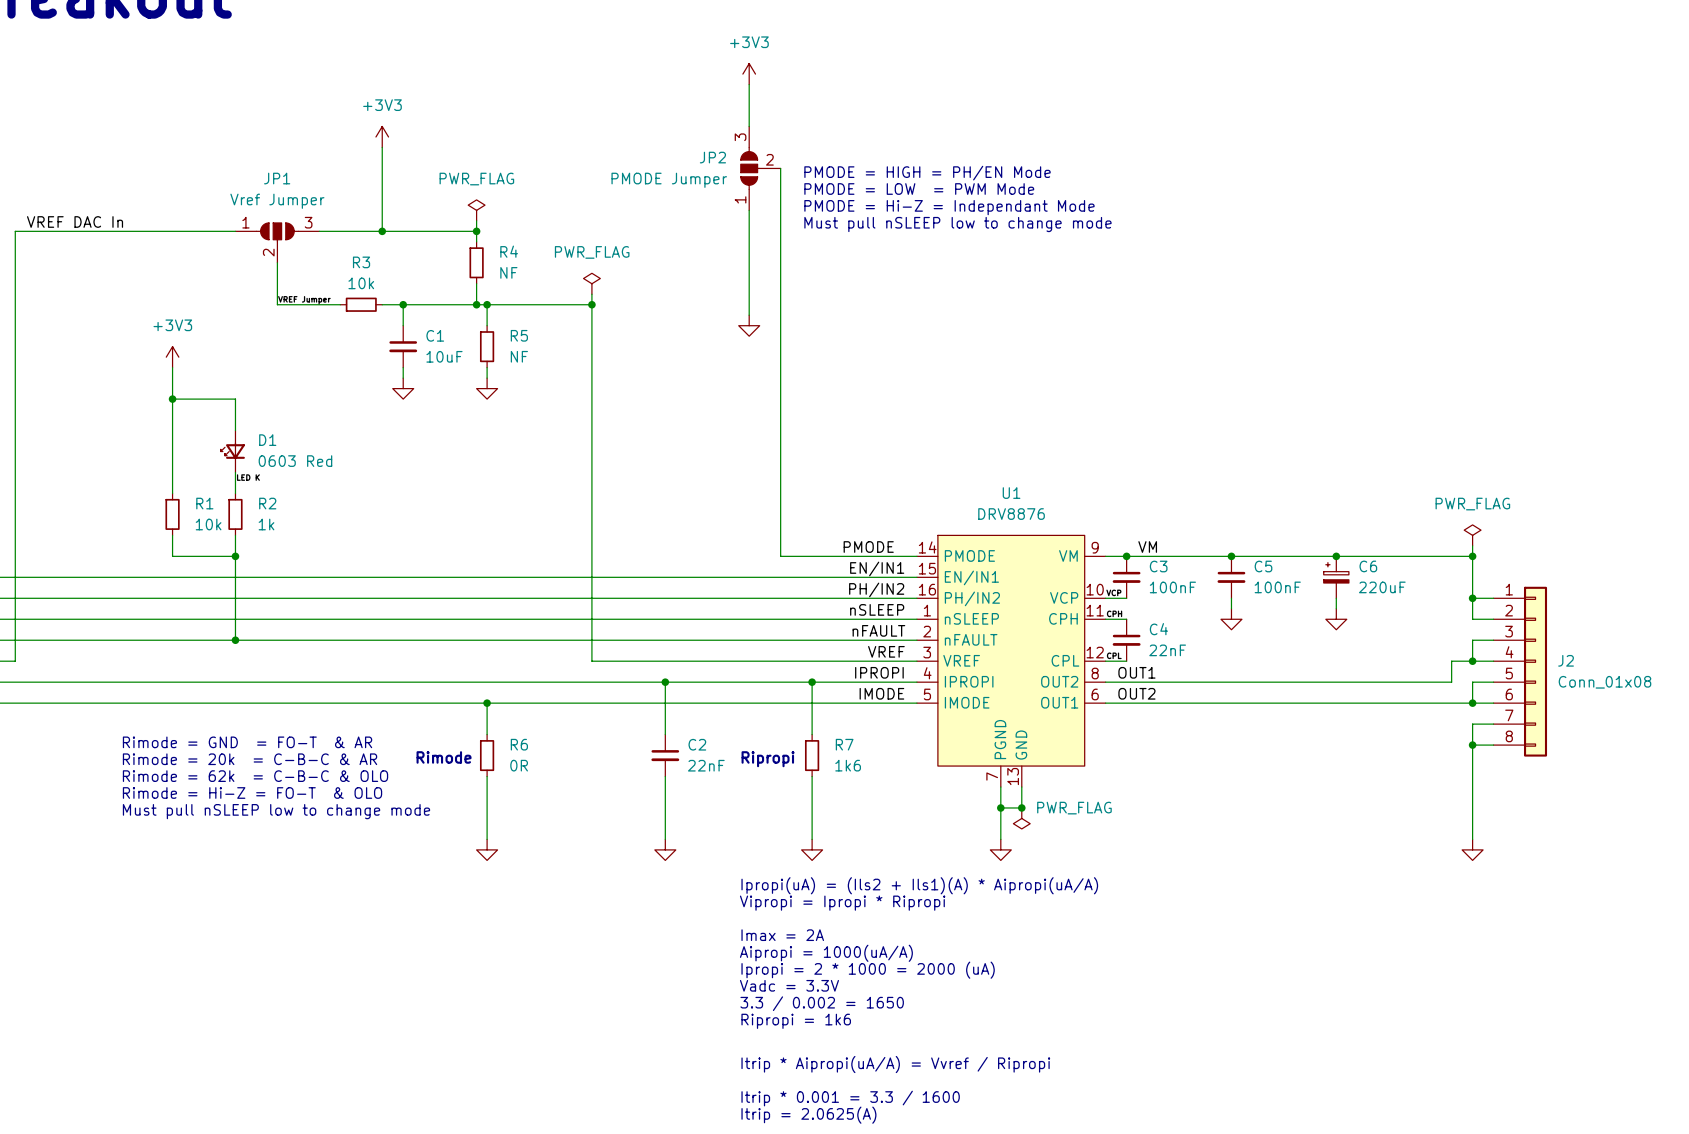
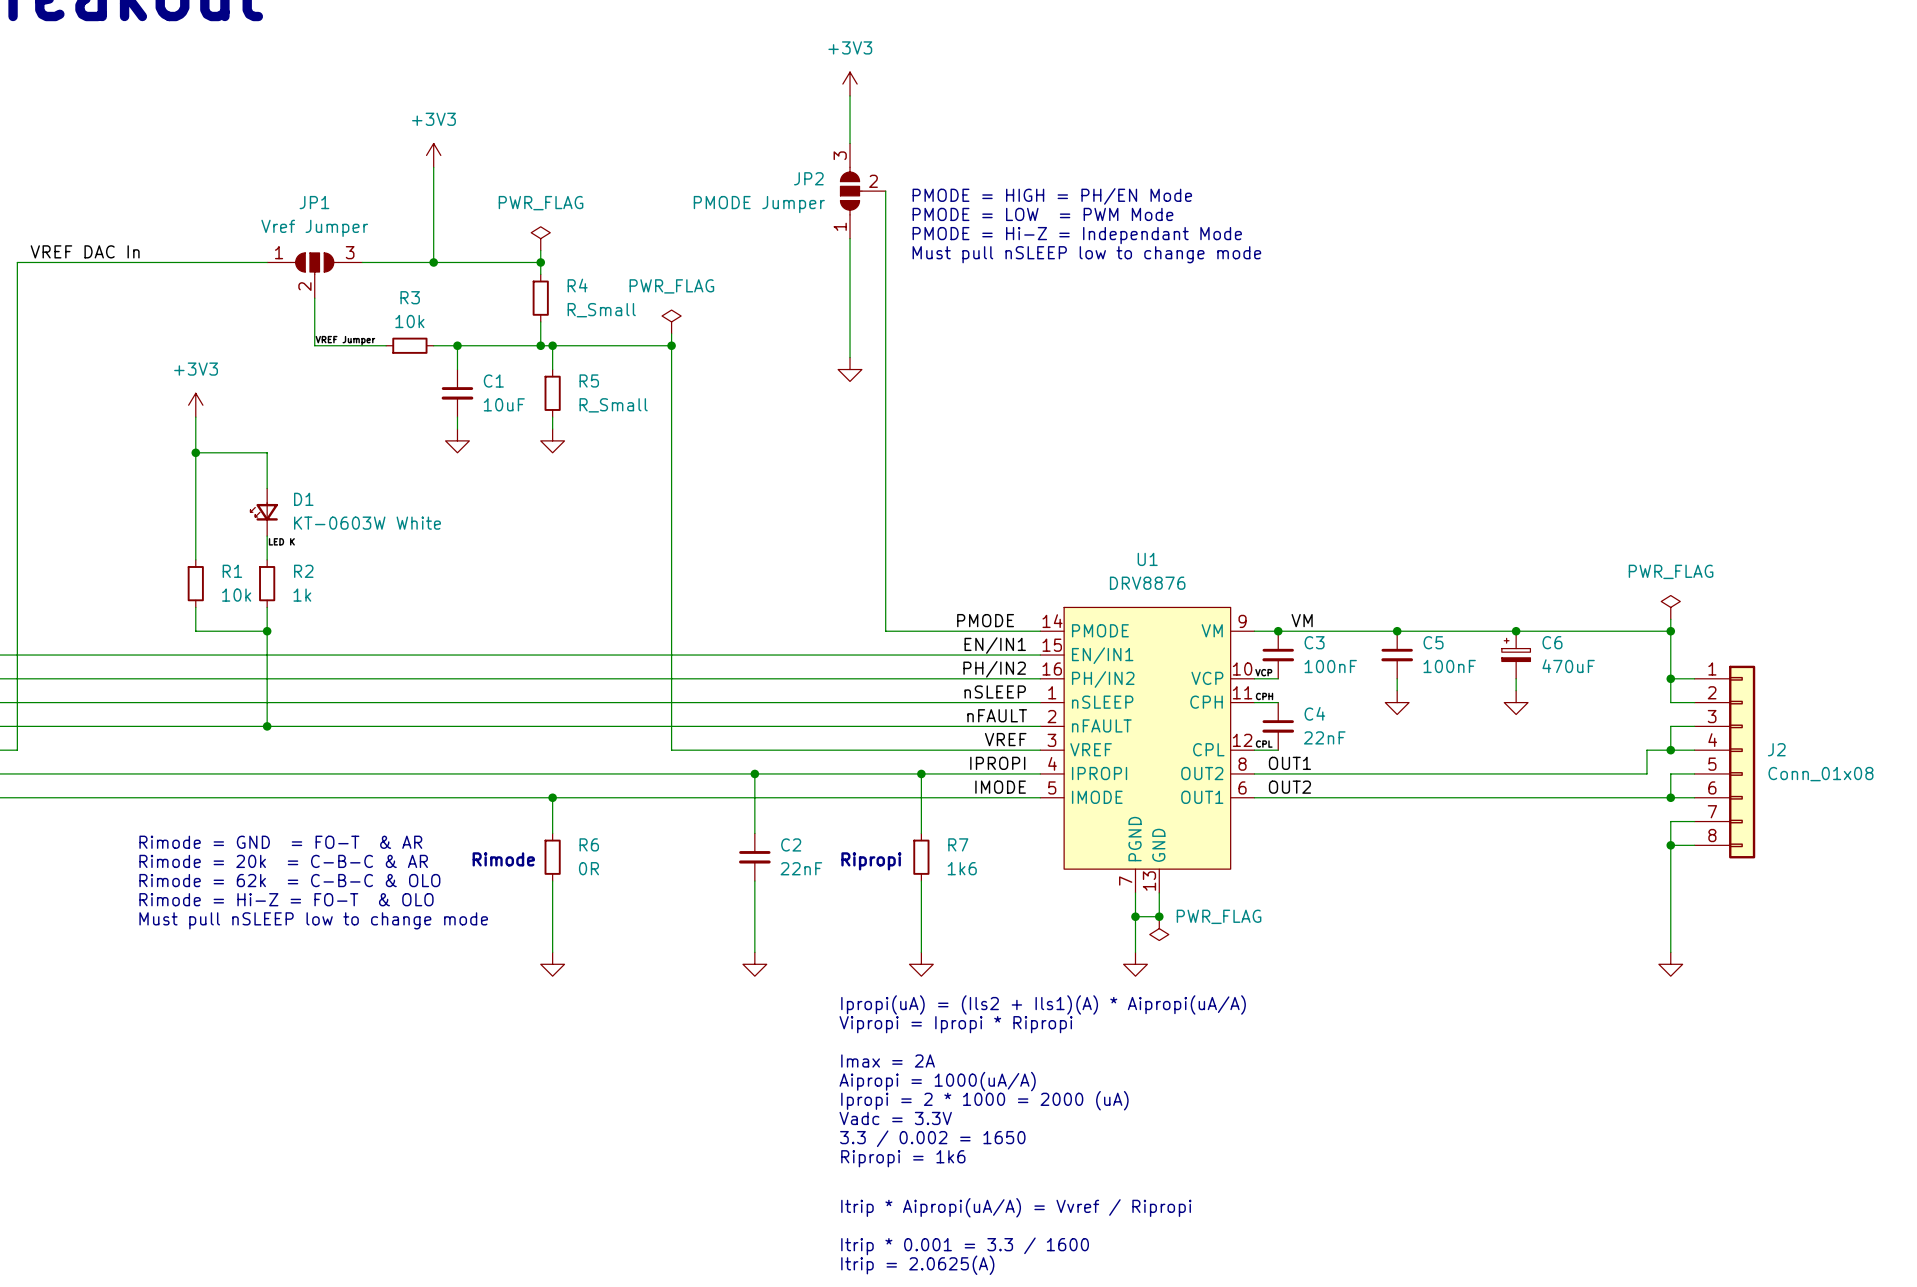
R4 value: NF (508, 272) -> R_Small (601, 310)
R5 value: NF (519, 356) -> R_Small (613, 405)
D1 value: 0603 Red (295, 461) -> KT-0603W White (367, 523)
C6 value: 220uF (1382, 587) -> 470uF (1568, 666)

